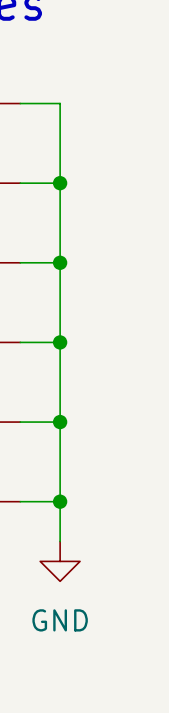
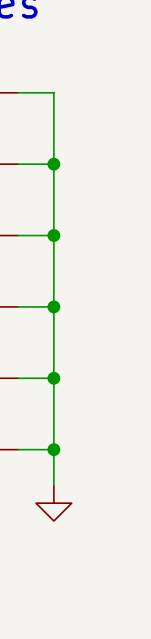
power symbol text: GND (60, 620) -> none

